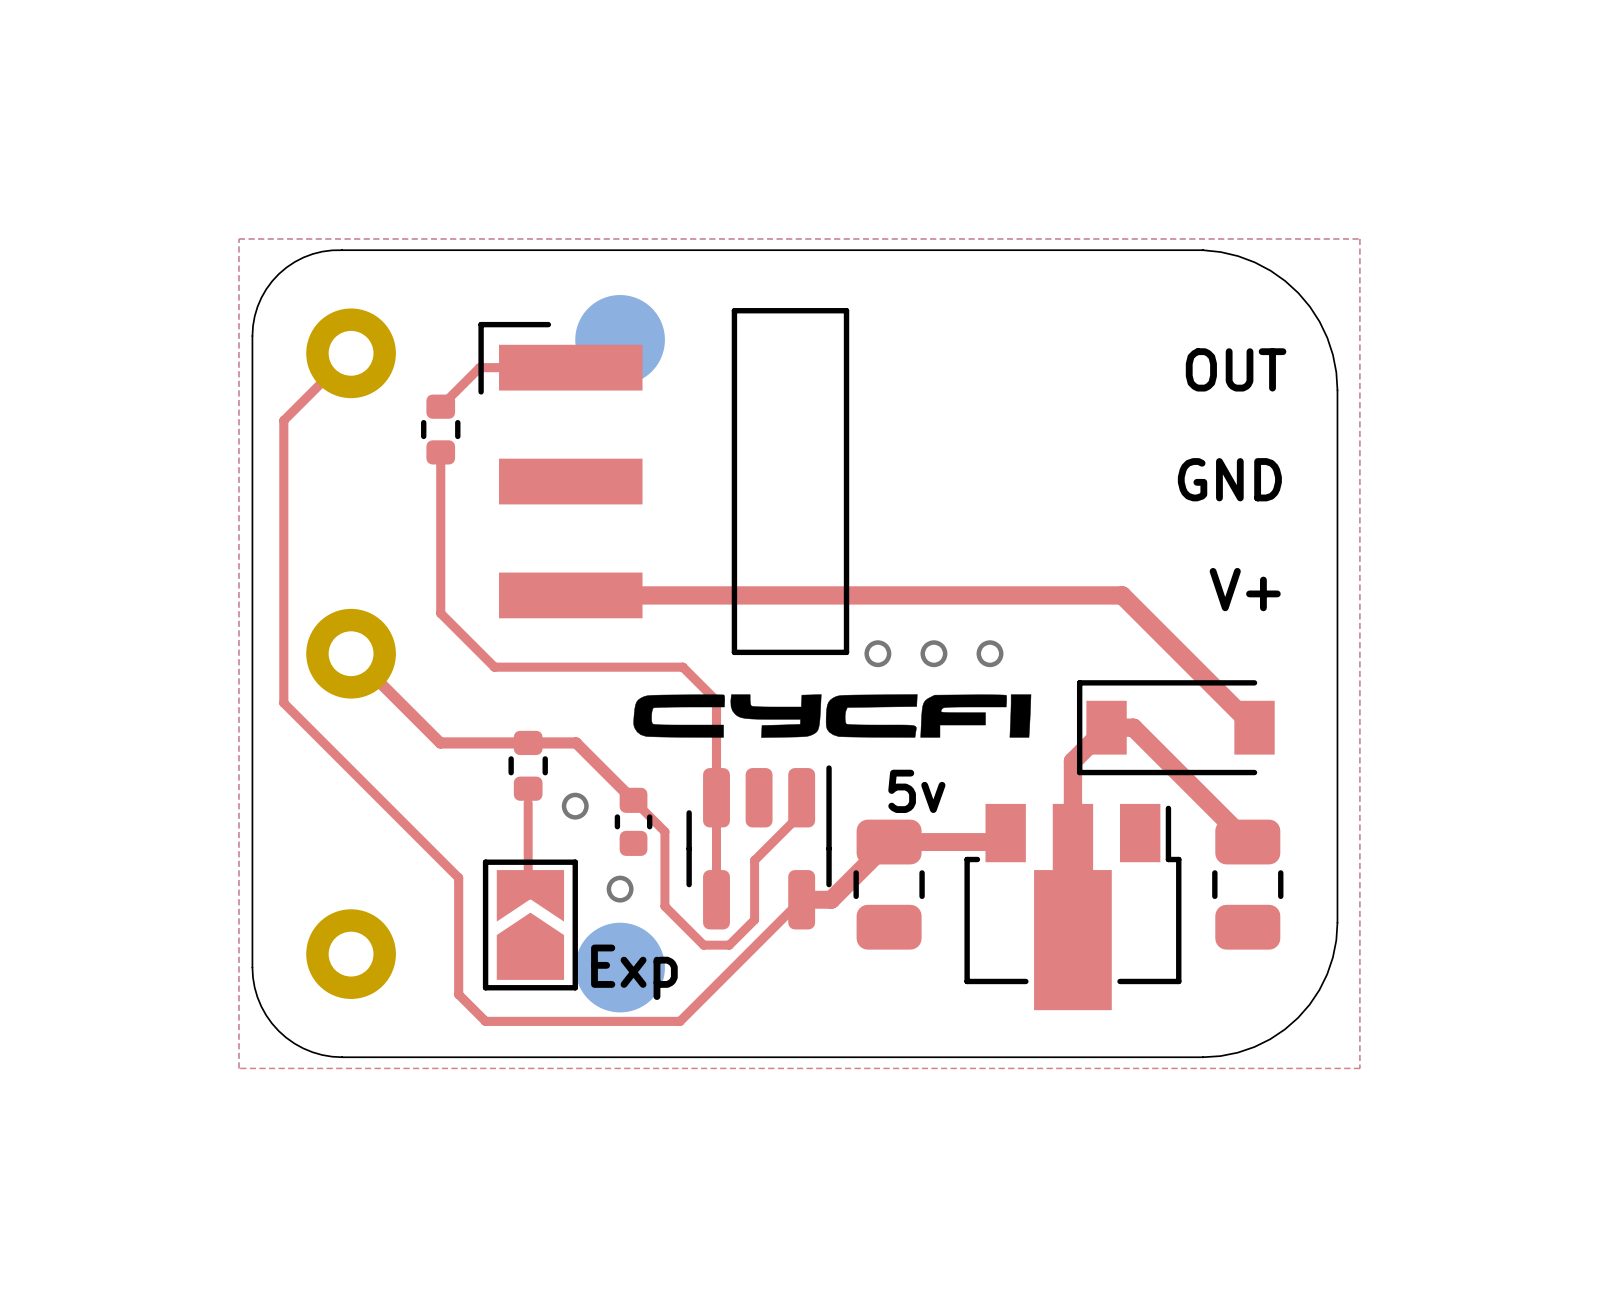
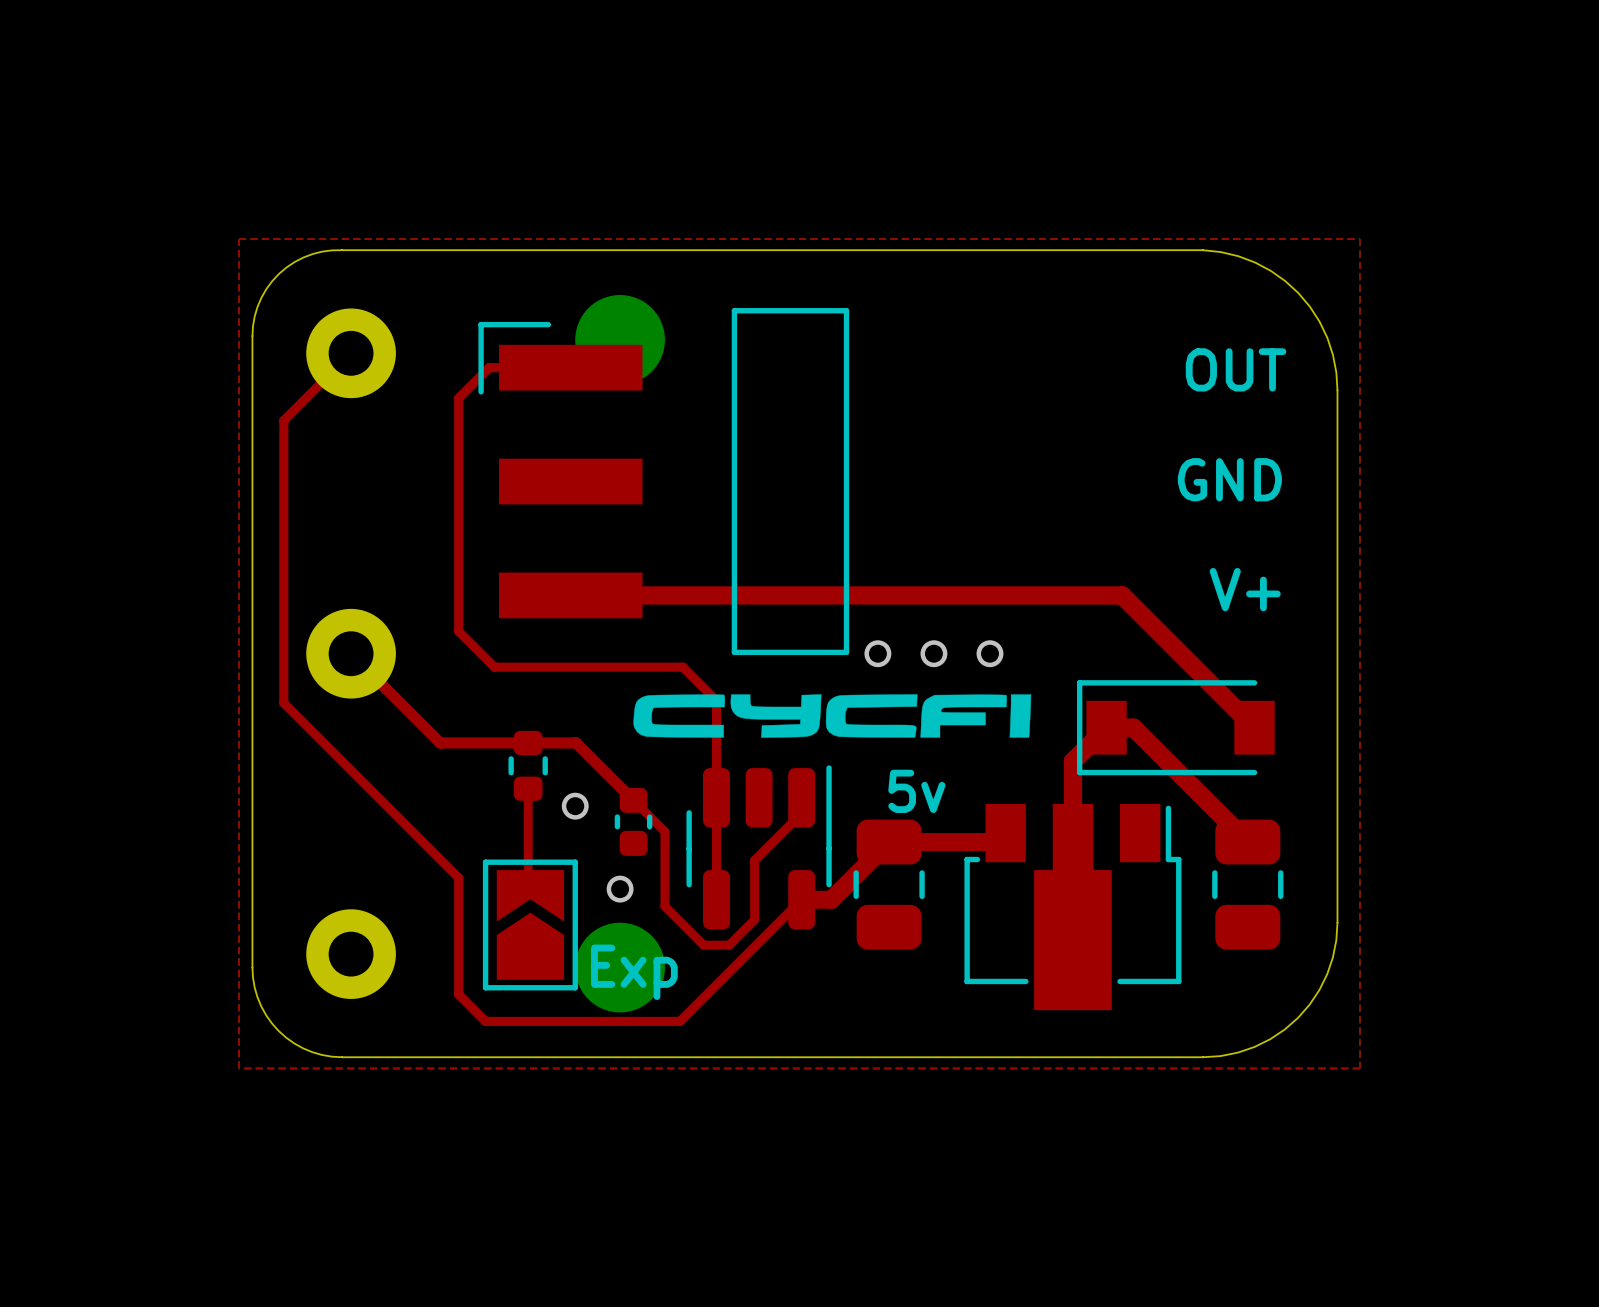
top track: (489, 367) (479, 367) (440, 406) -> none
part: (440, 429) -> none
top track: (440, 452) (440, 613) (458, 631) -> (489, 367) (458, 398) (458, 631)

